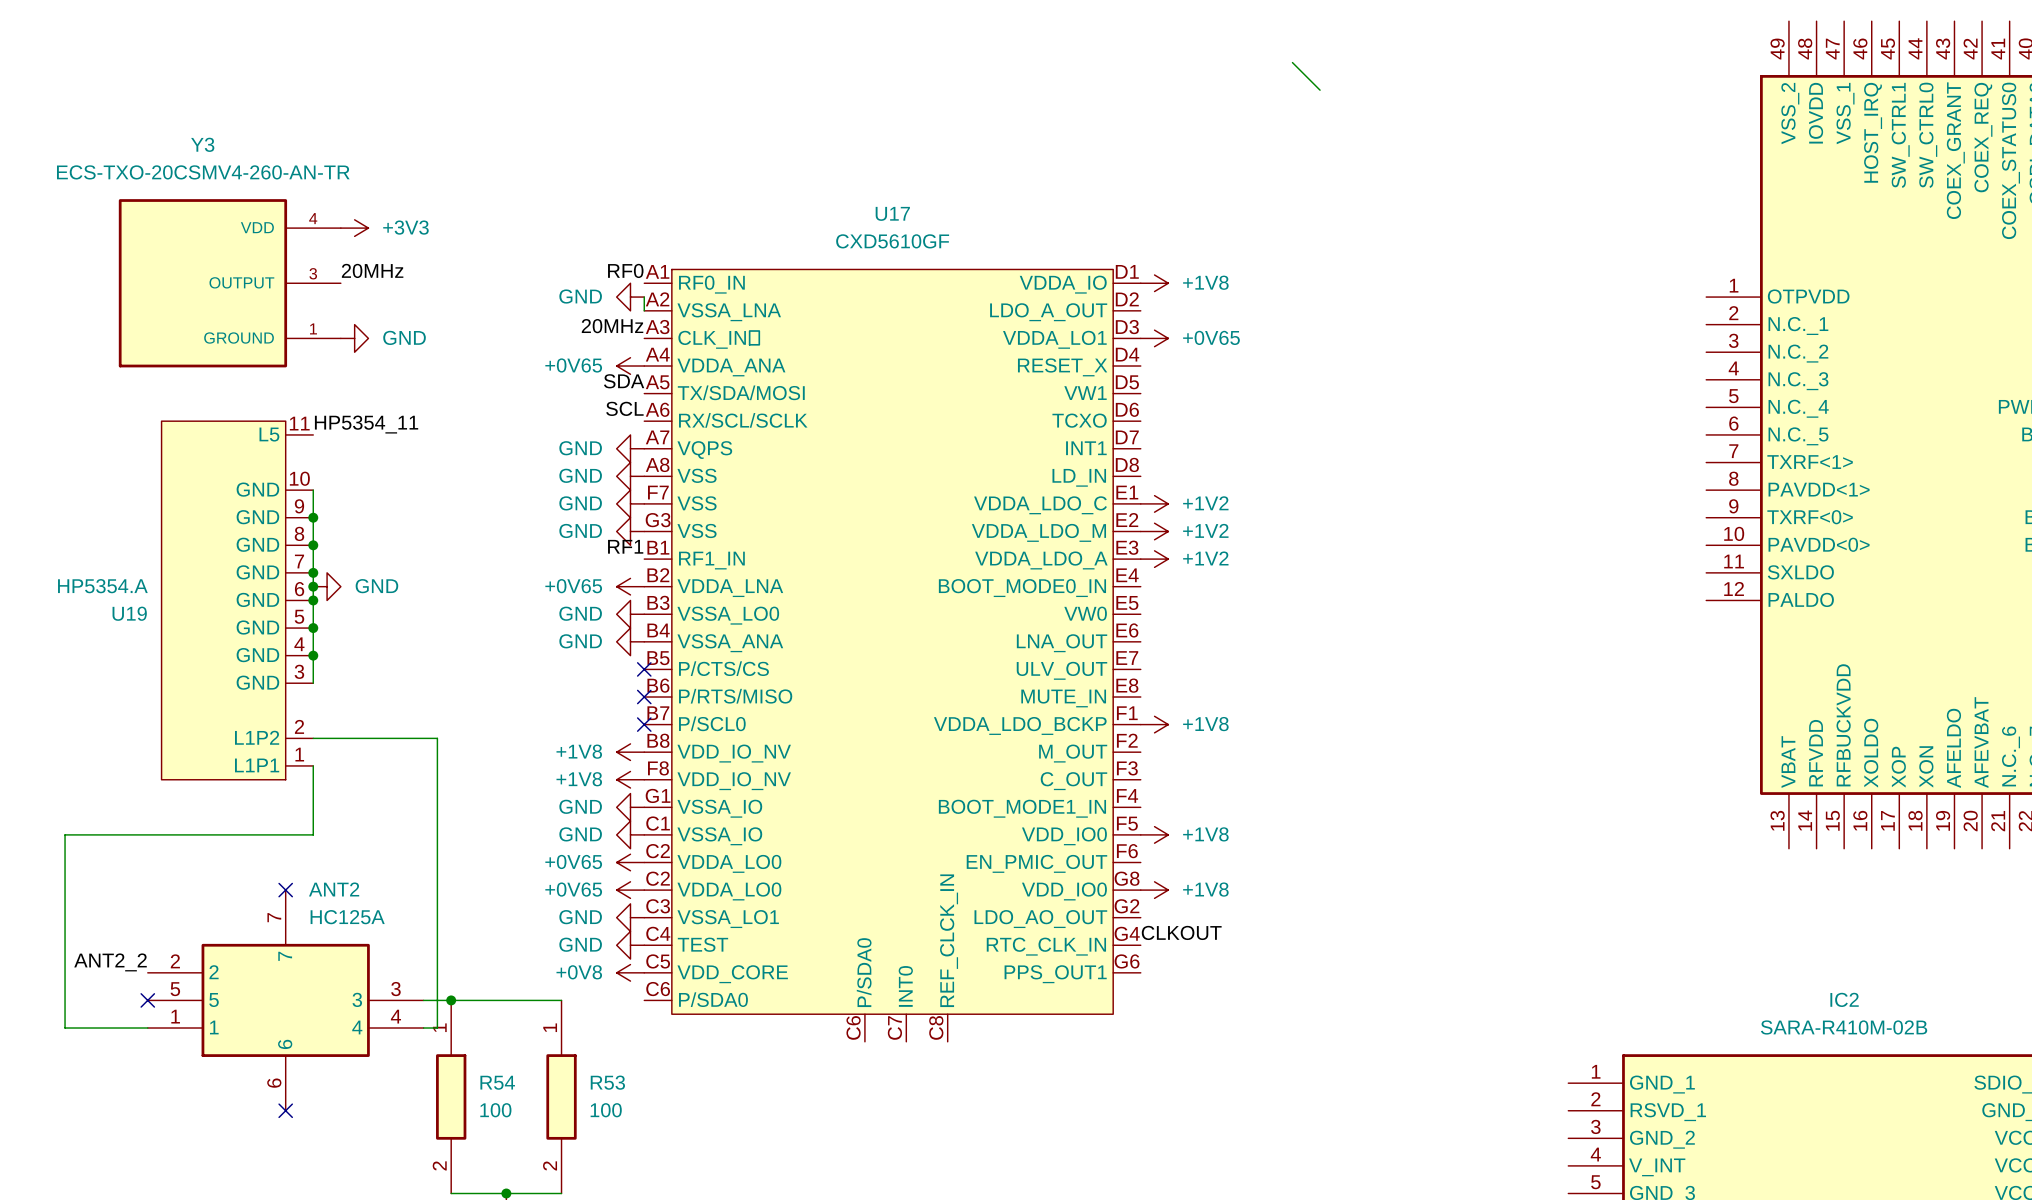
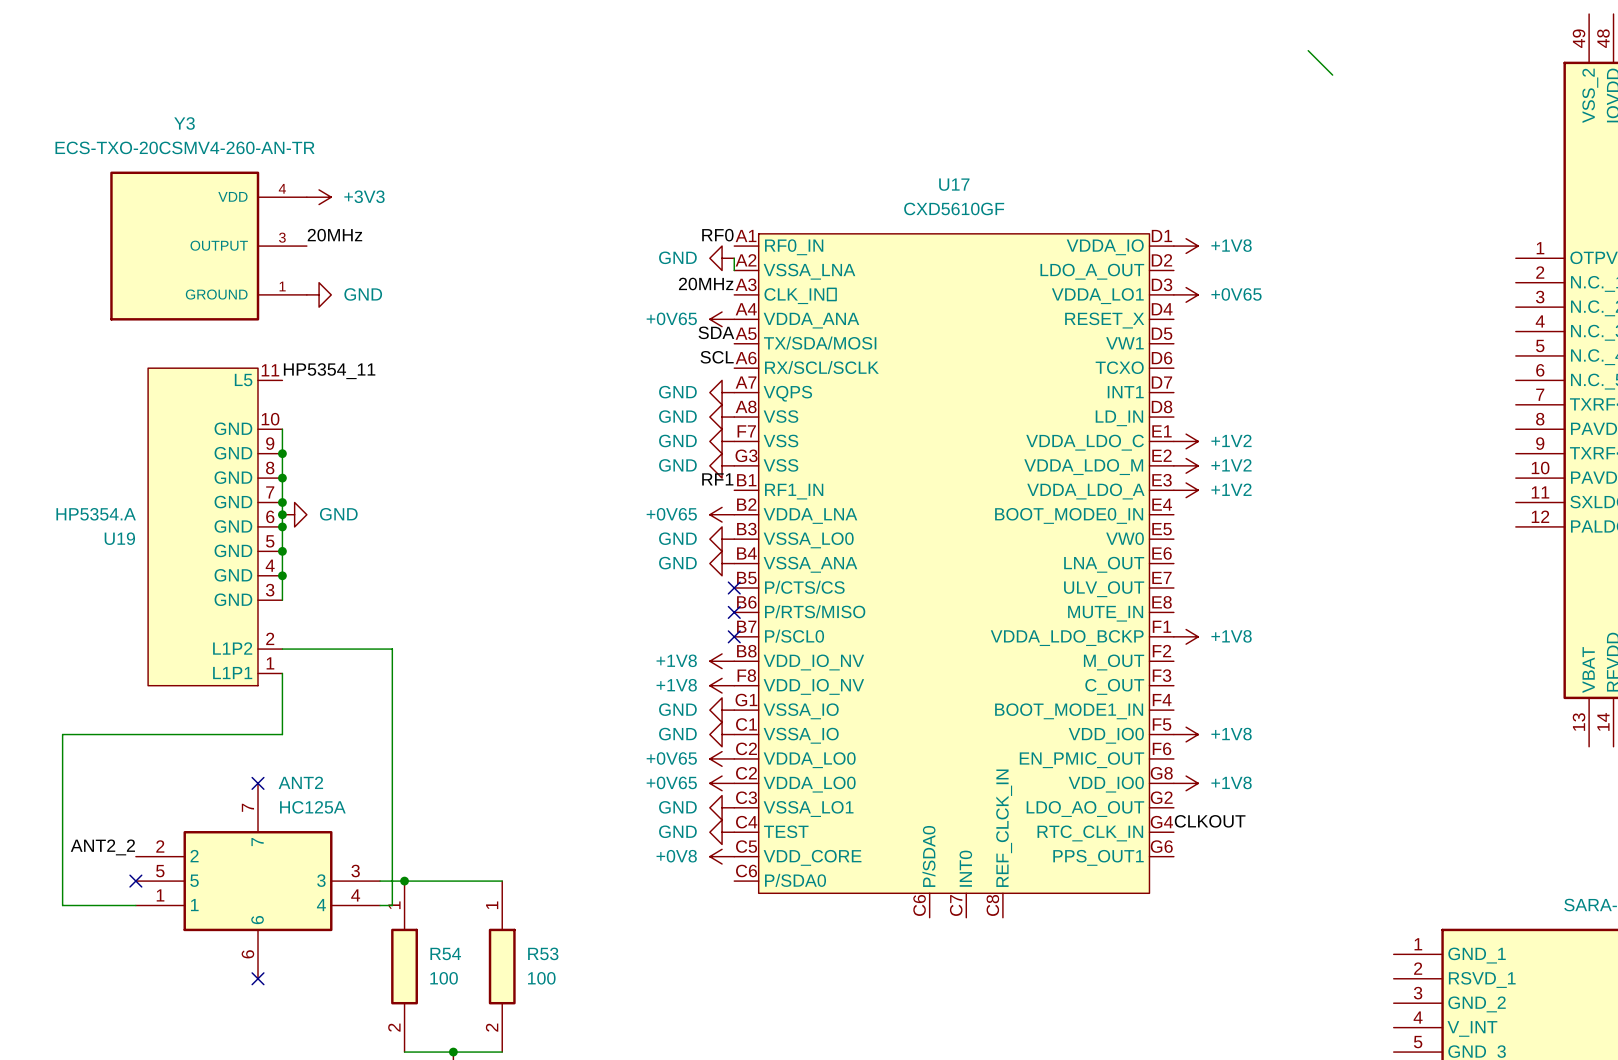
wire: (1292, 62) (1320, 90) -> (1308, 50) (1332, 75)
label position: RF0 (625, 270) -> RF0 (717, 235)
power symbol position: +1V8 (1154, 283) -> +1V8 (1186, 246)
power symbol: GND (630, 297) -> none
power symbol: none -> GND (722, 258)
label position: 20MHz (612, 326) -> 20MHz (706, 284)
power symbol: +0V65 (1154, 338) -> none
power symbol: none -> +0V65 (1186, 294)
power symbol: +0V65 (630, 366) -> none
power symbol: none -> +0V65 (722, 319)
label position: SDA (624, 381) -> SDA (716, 332)
label position: SCL (624, 408) -> SCL (717, 357)
power symbol: GND (630, 448) -> none
power symbol: none -> GND (722, 392)
power symbol: GND (630, 476) -> none
power symbol: none -> GND (722, 417)
power symbol: GND (630, 503) -> none
power symbol: none -> GND (722, 441)
power symbol: +1V2 (1154, 503) -> none
power symbol: none -> +1V2 (1186, 441)
power symbol: GND (630, 531) -> none
power symbol: none -> GND (722, 465)
power symbol: +1V2 (1154, 531) -> none
power symbol: none -> +1V2 (1186, 465)
label position: RF1 (625, 546) -> RF1 (717, 479)
power symbol: +1V2 (1154, 559) -> none
power symbol: none -> +1V2 (1186, 490)
power symbol: +0V65 (630, 586) -> none
power symbol: none -> +0V65 (722, 514)
power symbol: GND (630, 614) -> none
power symbol: none -> GND (722, 539)
power symbol: GND (630, 641) -> none
power symbol: none -> GND (722, 563)
U17 position: (892, 655) -> (954, 575)
no-connect mark: (644, 669) -> none
no-connect mark: none -> (734, 587)
no-connect mark: (644, 697) -> none
no-connect mark: none -> (734, 612)
no-connect mark: (644, 724) -> none
no-connect mark: none -> (734, 636)
power symbol: +1V8 (1154, 724) -> none
power symbol: none -> +1V8 (1186, 636)
power symbol: +1V8 (630, 752) -> none
power symbol: none -> +1V8 (722, 661)
power symbol: +1V8 (630, 779) -> none
power symbol: none -> +1V8 (722, 685)
power symbol: GND (630, 807) -> none
power symbol: none -> GND (722, 710)
power symbol: GND (630, 834) -> none
power symbol: none -> GND (722, 734)
power symbol: +1V8 (1154, 834) -> none
power symbol: none -> +1V8 (1186, 734)
power symbol: +0V65 (630, 862) -> none
power symbol: none -> +0V65 (722, 758)
power symbol: +0V65 (630, 890) -> none
power symbol: none -> +0V65 (722, 783)
power symbol: +1V8 (1154, 890) -> none
power symbol: none -> +1V8 (1186, 783)
power symbol: GND (630, 917) -> none
power symbol: none -> GND (722, 807)
label position: CLKOUT (1181, 932) -> CLKOUT (1210, 821)
power symbol: GND (630, 945) -> none
power symbol: none -> GND (722, 832)
power symbol position: +0V8 (630, 972) -> +0V8 (722, 856)

